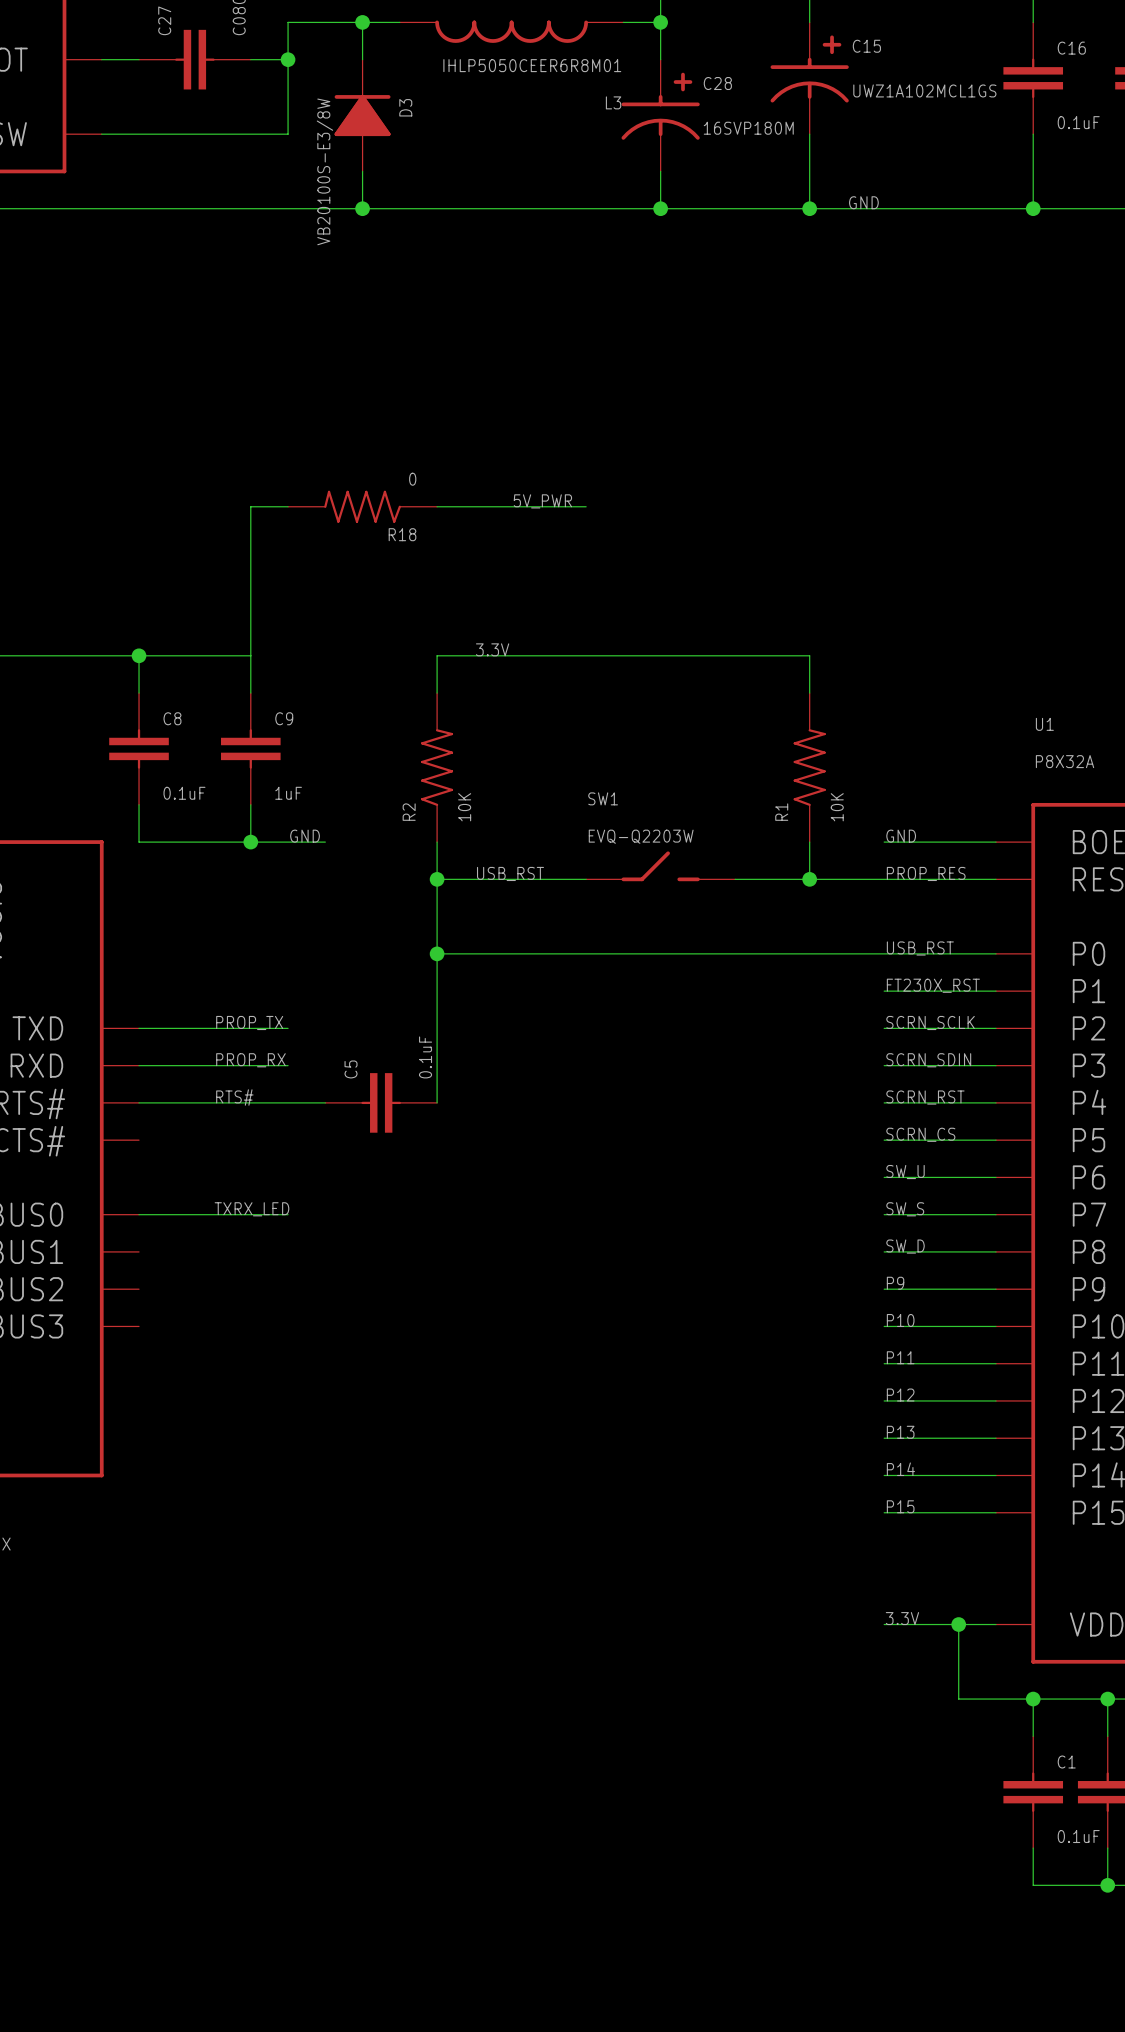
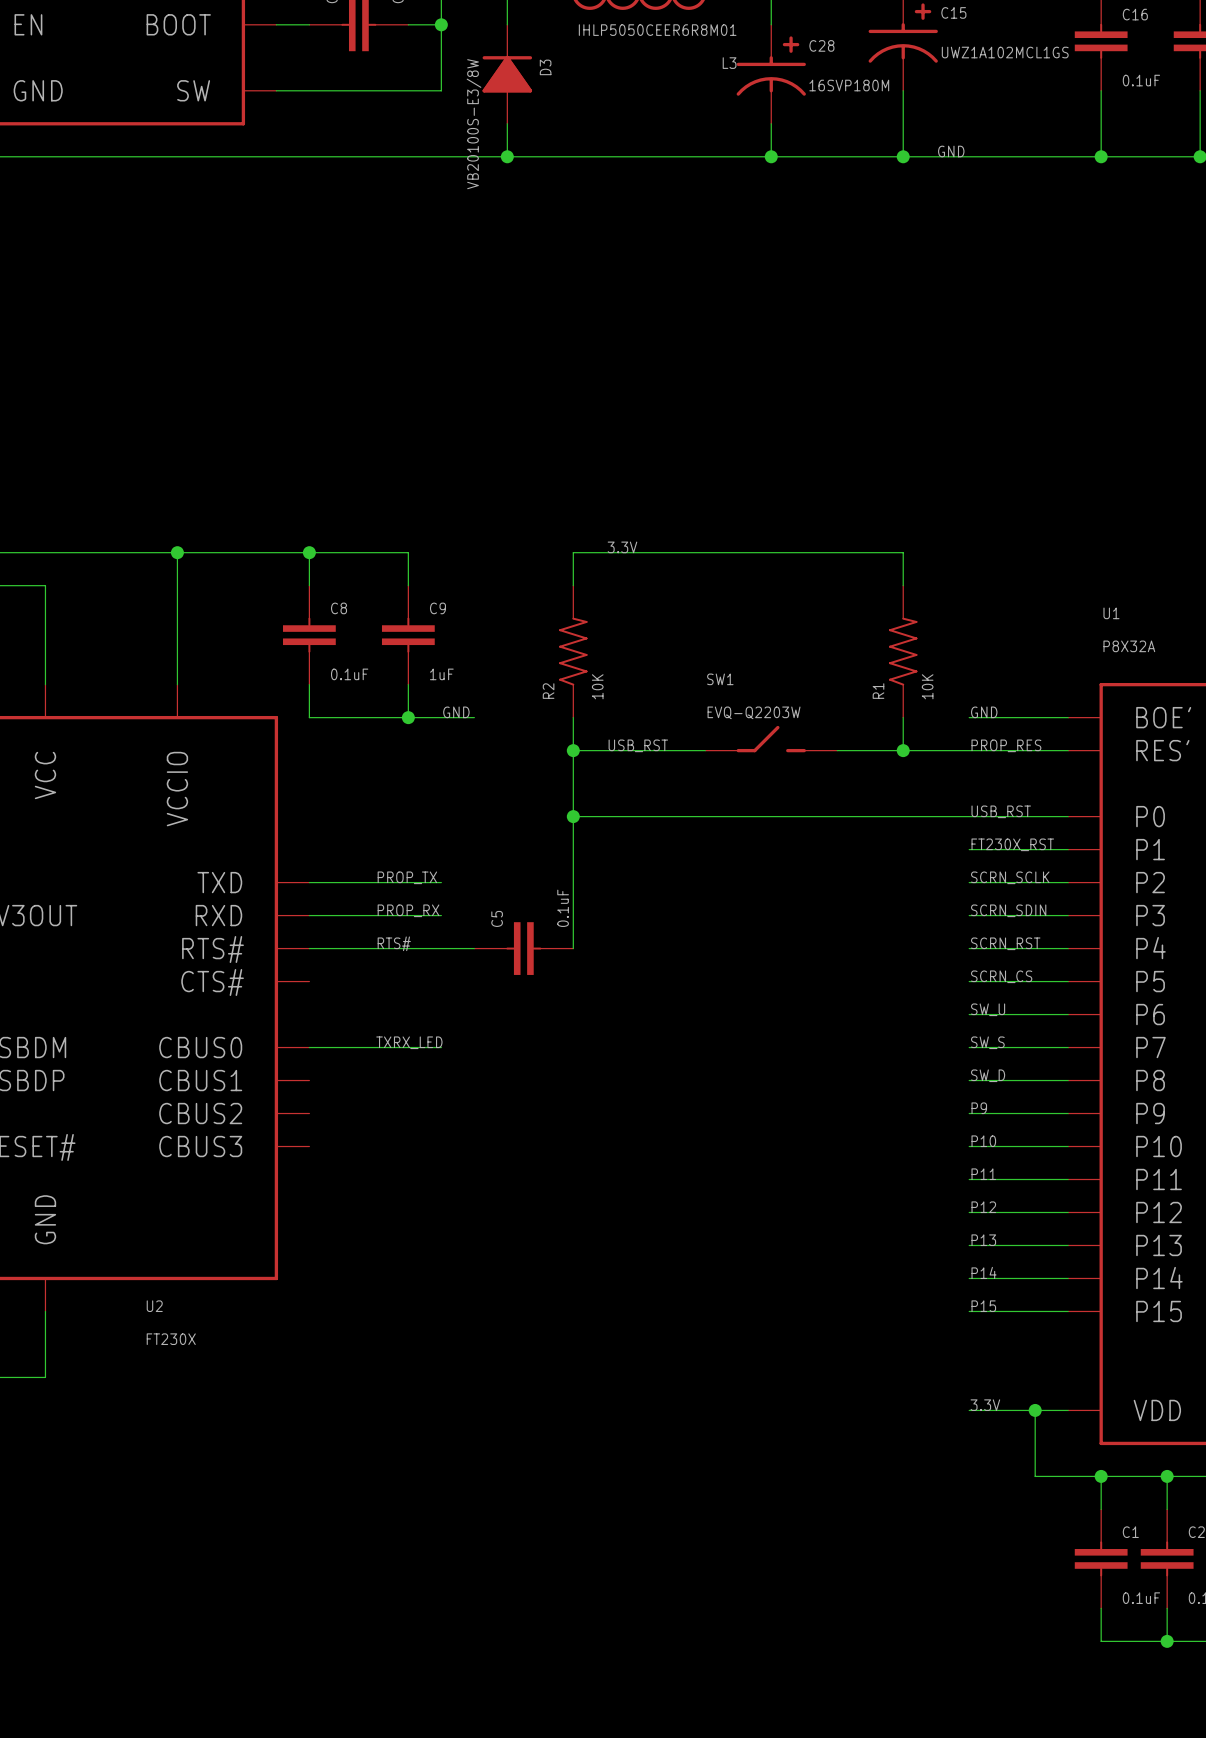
label: 5V_PWR (542, 501) -> none
wire: (288, 506) (250, 506) (250, 655) -> none
R18: 0 (362, 506) -> none
wire: (437, 506) (586, 506) -> none

